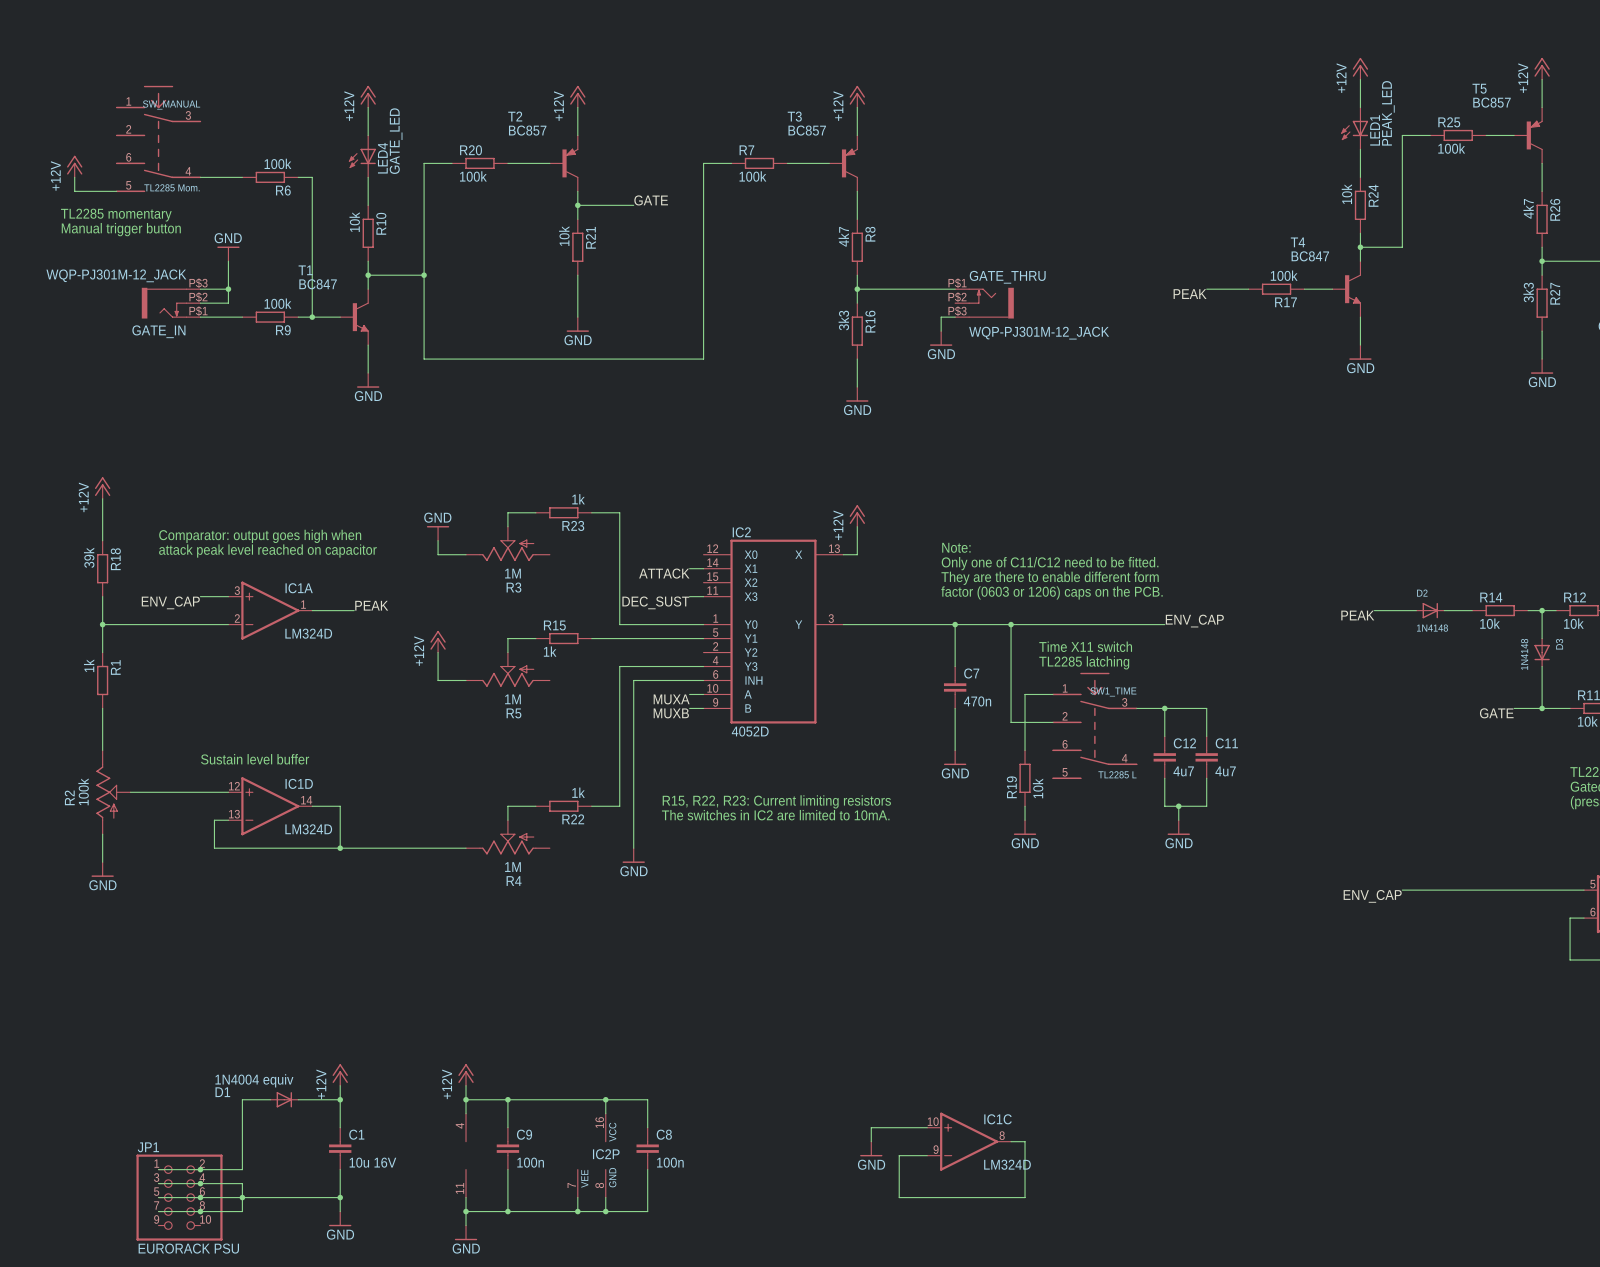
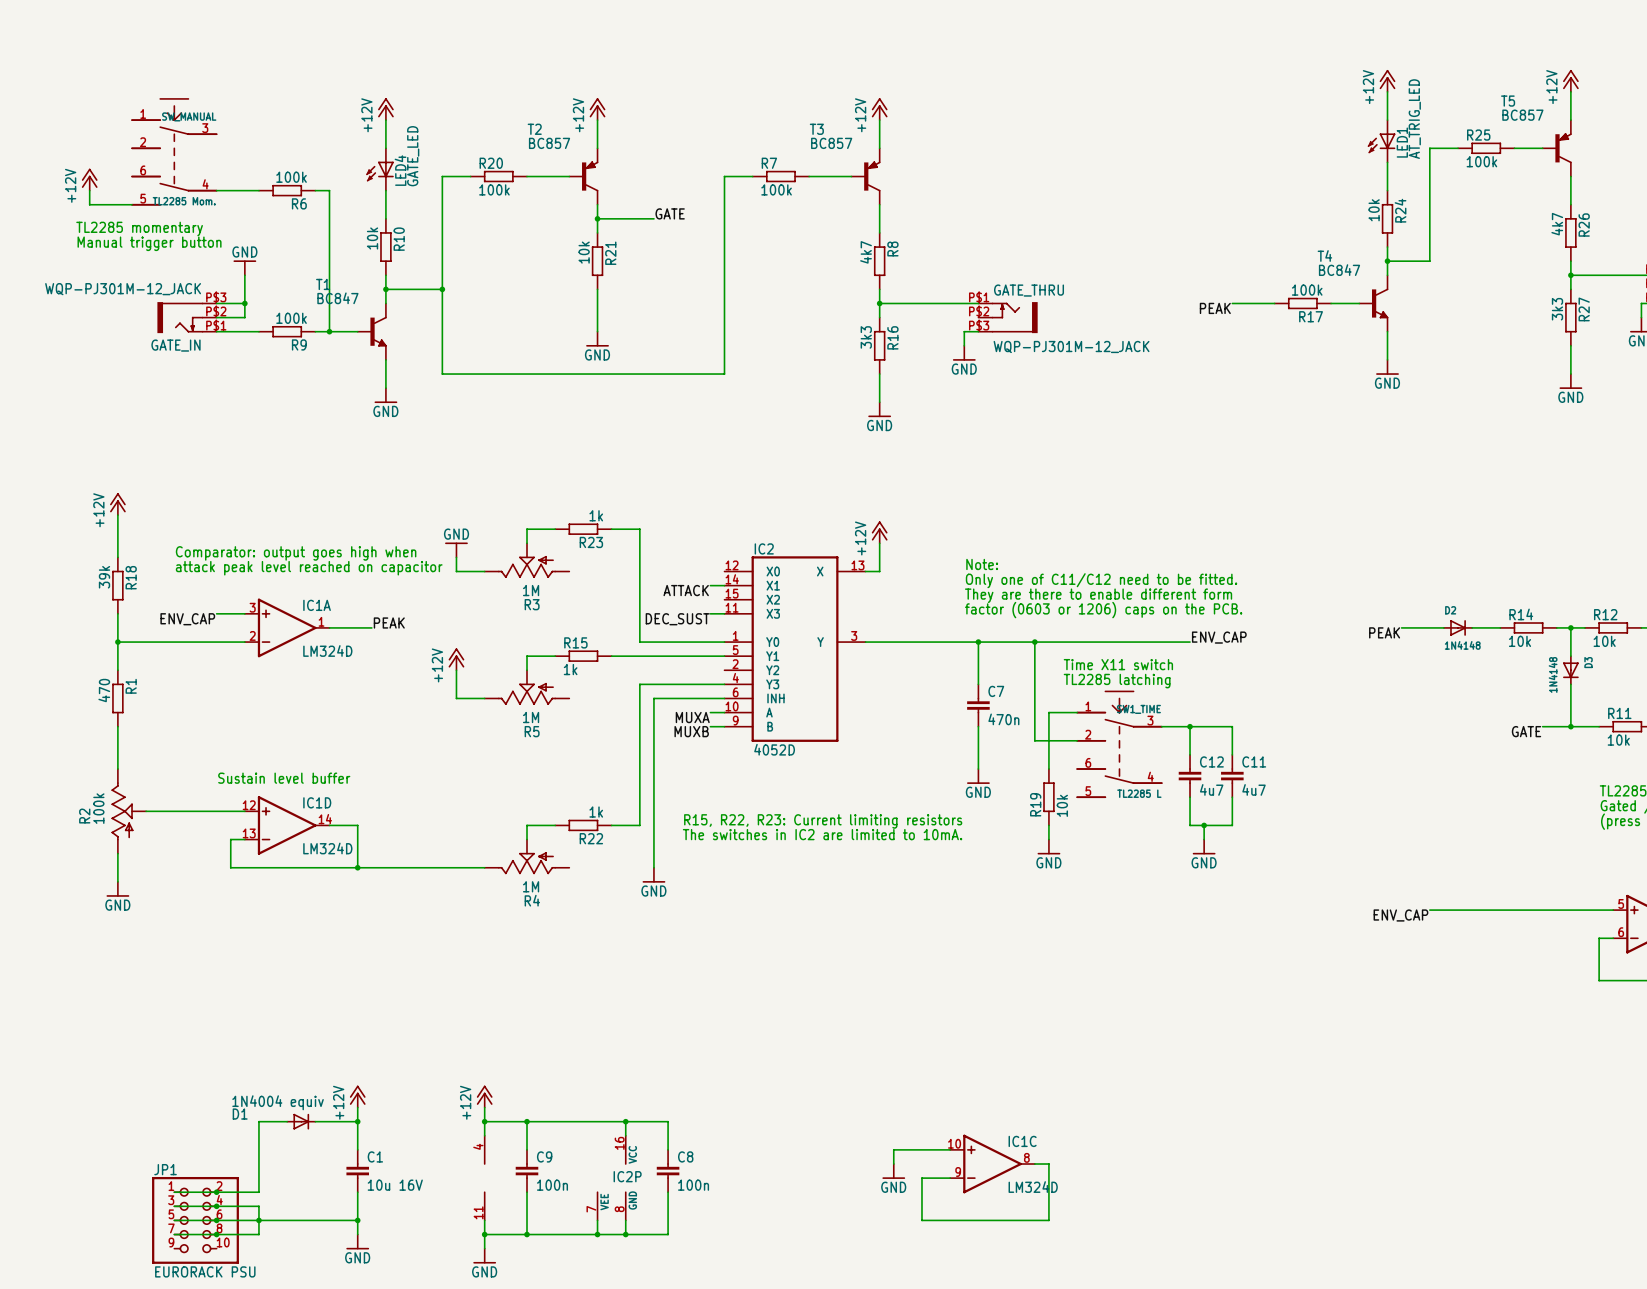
LED1 value: PEAK_LED (1388, 113) -> AT_TRIG_LED (1414, 119)
R1 value: 1k (89, 665) -> 470 (104, 690)

